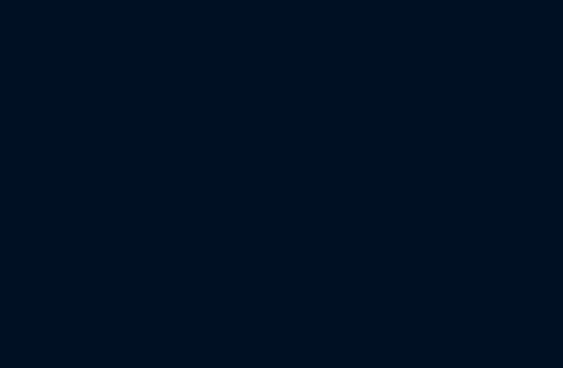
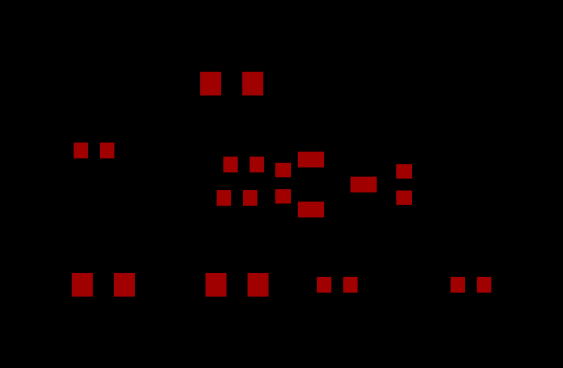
part: none -> (231, 83)
part: none -> (94, 150)
part: none -> (243, 164)
part: none -> (283, 183)
part: none -> (337, 184)
part: none -> (404, 184)
part: none -> (237, 197)
part: none -> (103, 284)
part: none -> (237, 284)
part: none -> (337, 284)
part: none -> (470, 284)

